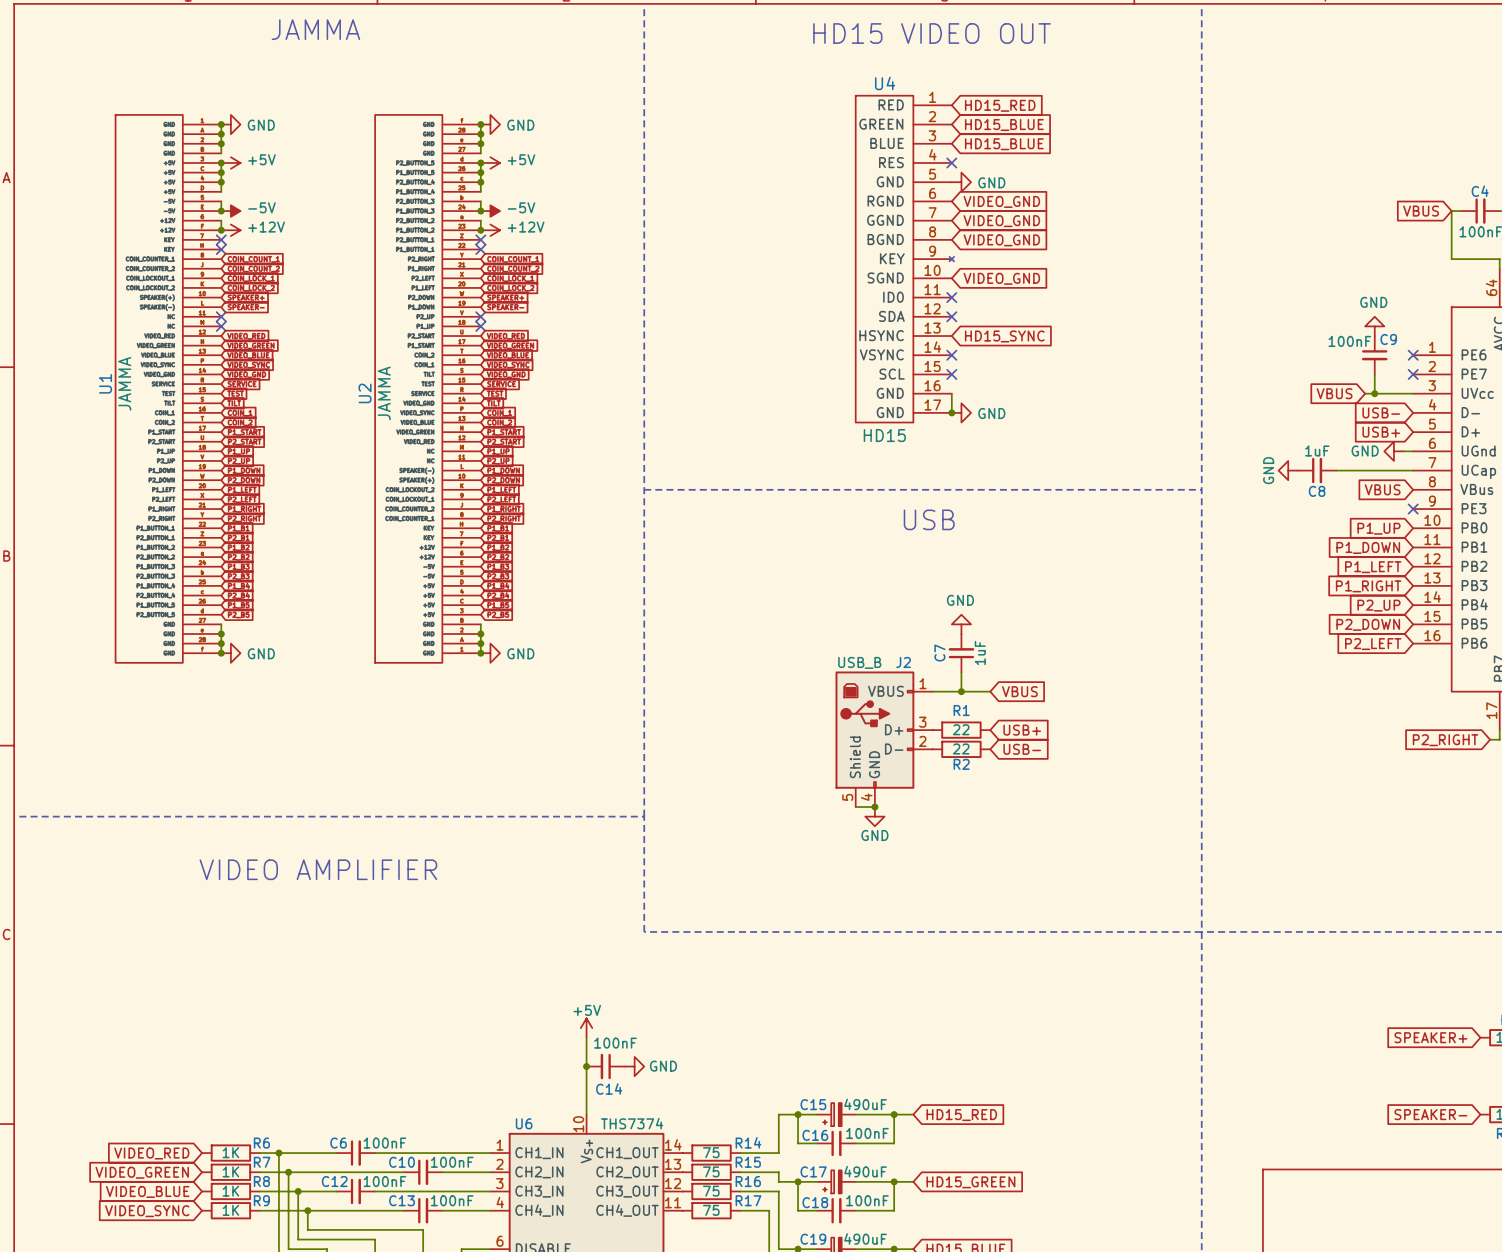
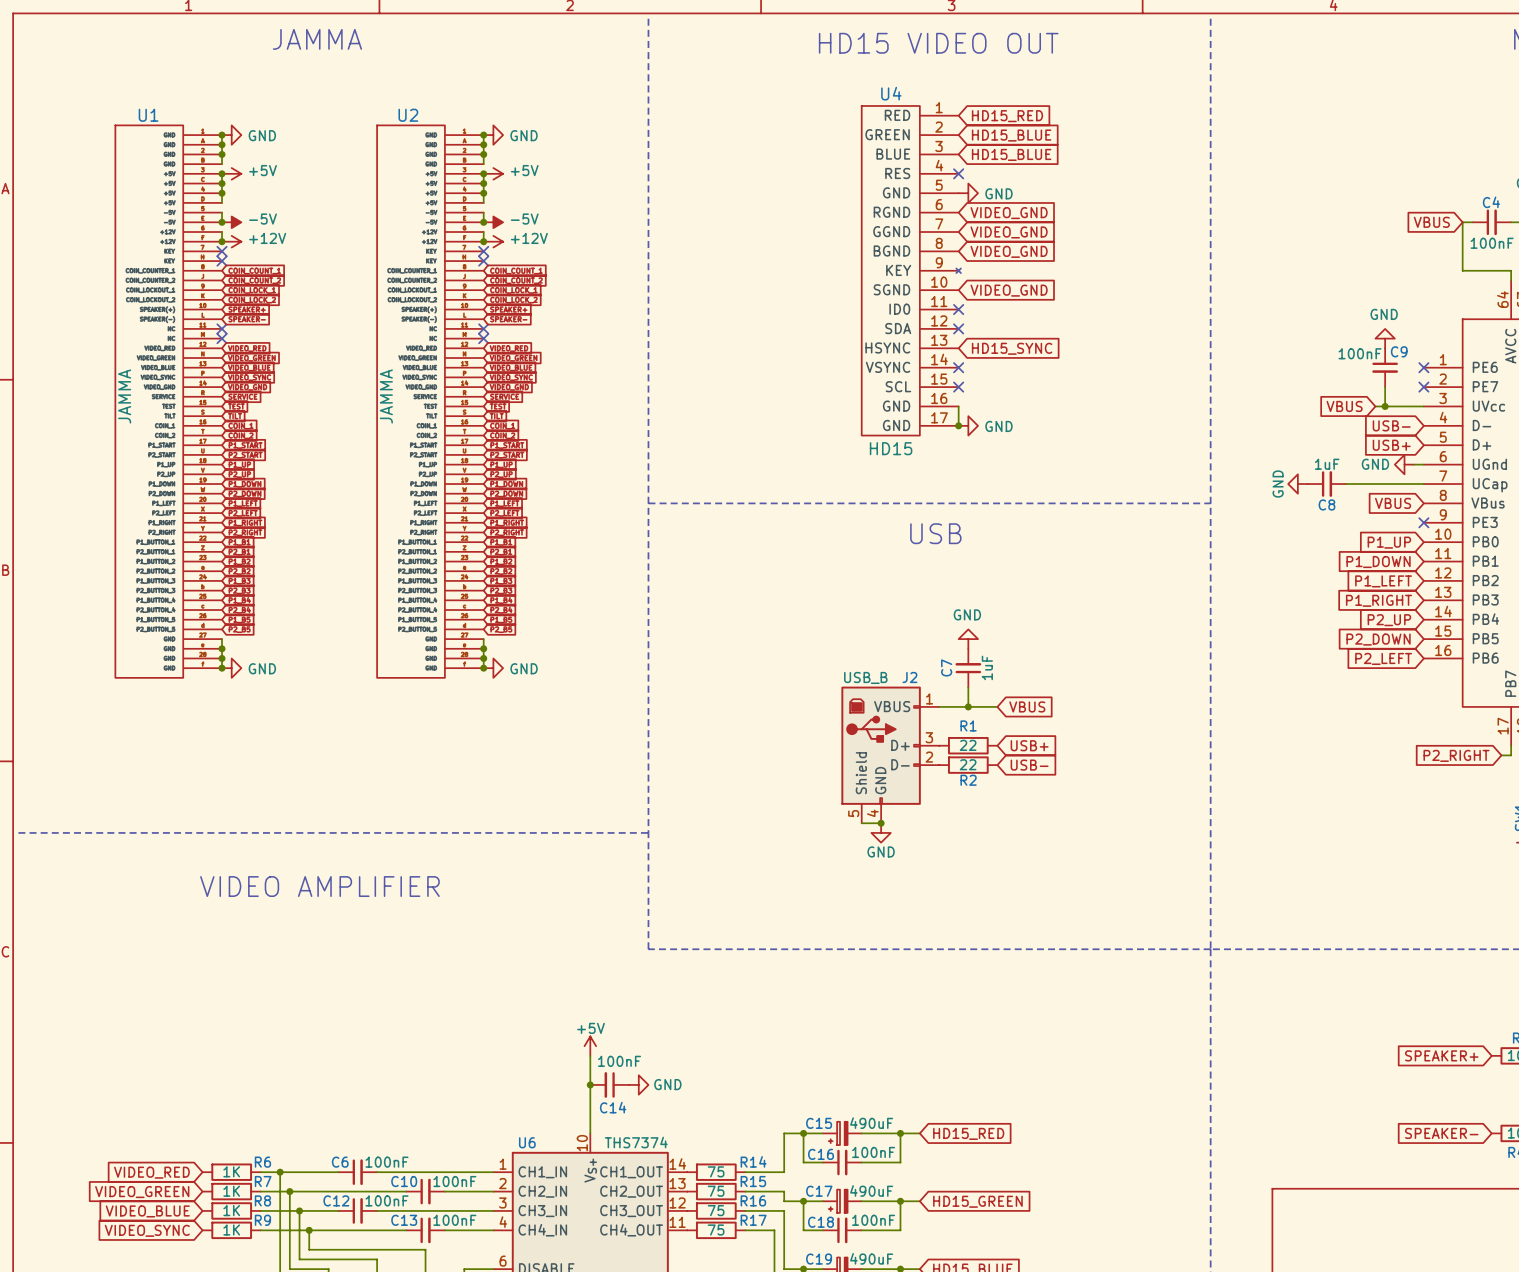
U1 name rotation: 0° (105, 383) -> 90° clockwise (148, 115)
U1 name position: U1 (105, 383) -> U1 (148, 115)
U2 flip: as is (408, 388) -> up-down (411, 401)
U2 name position: U2 (365, 393) -> U2 (408, 115)

